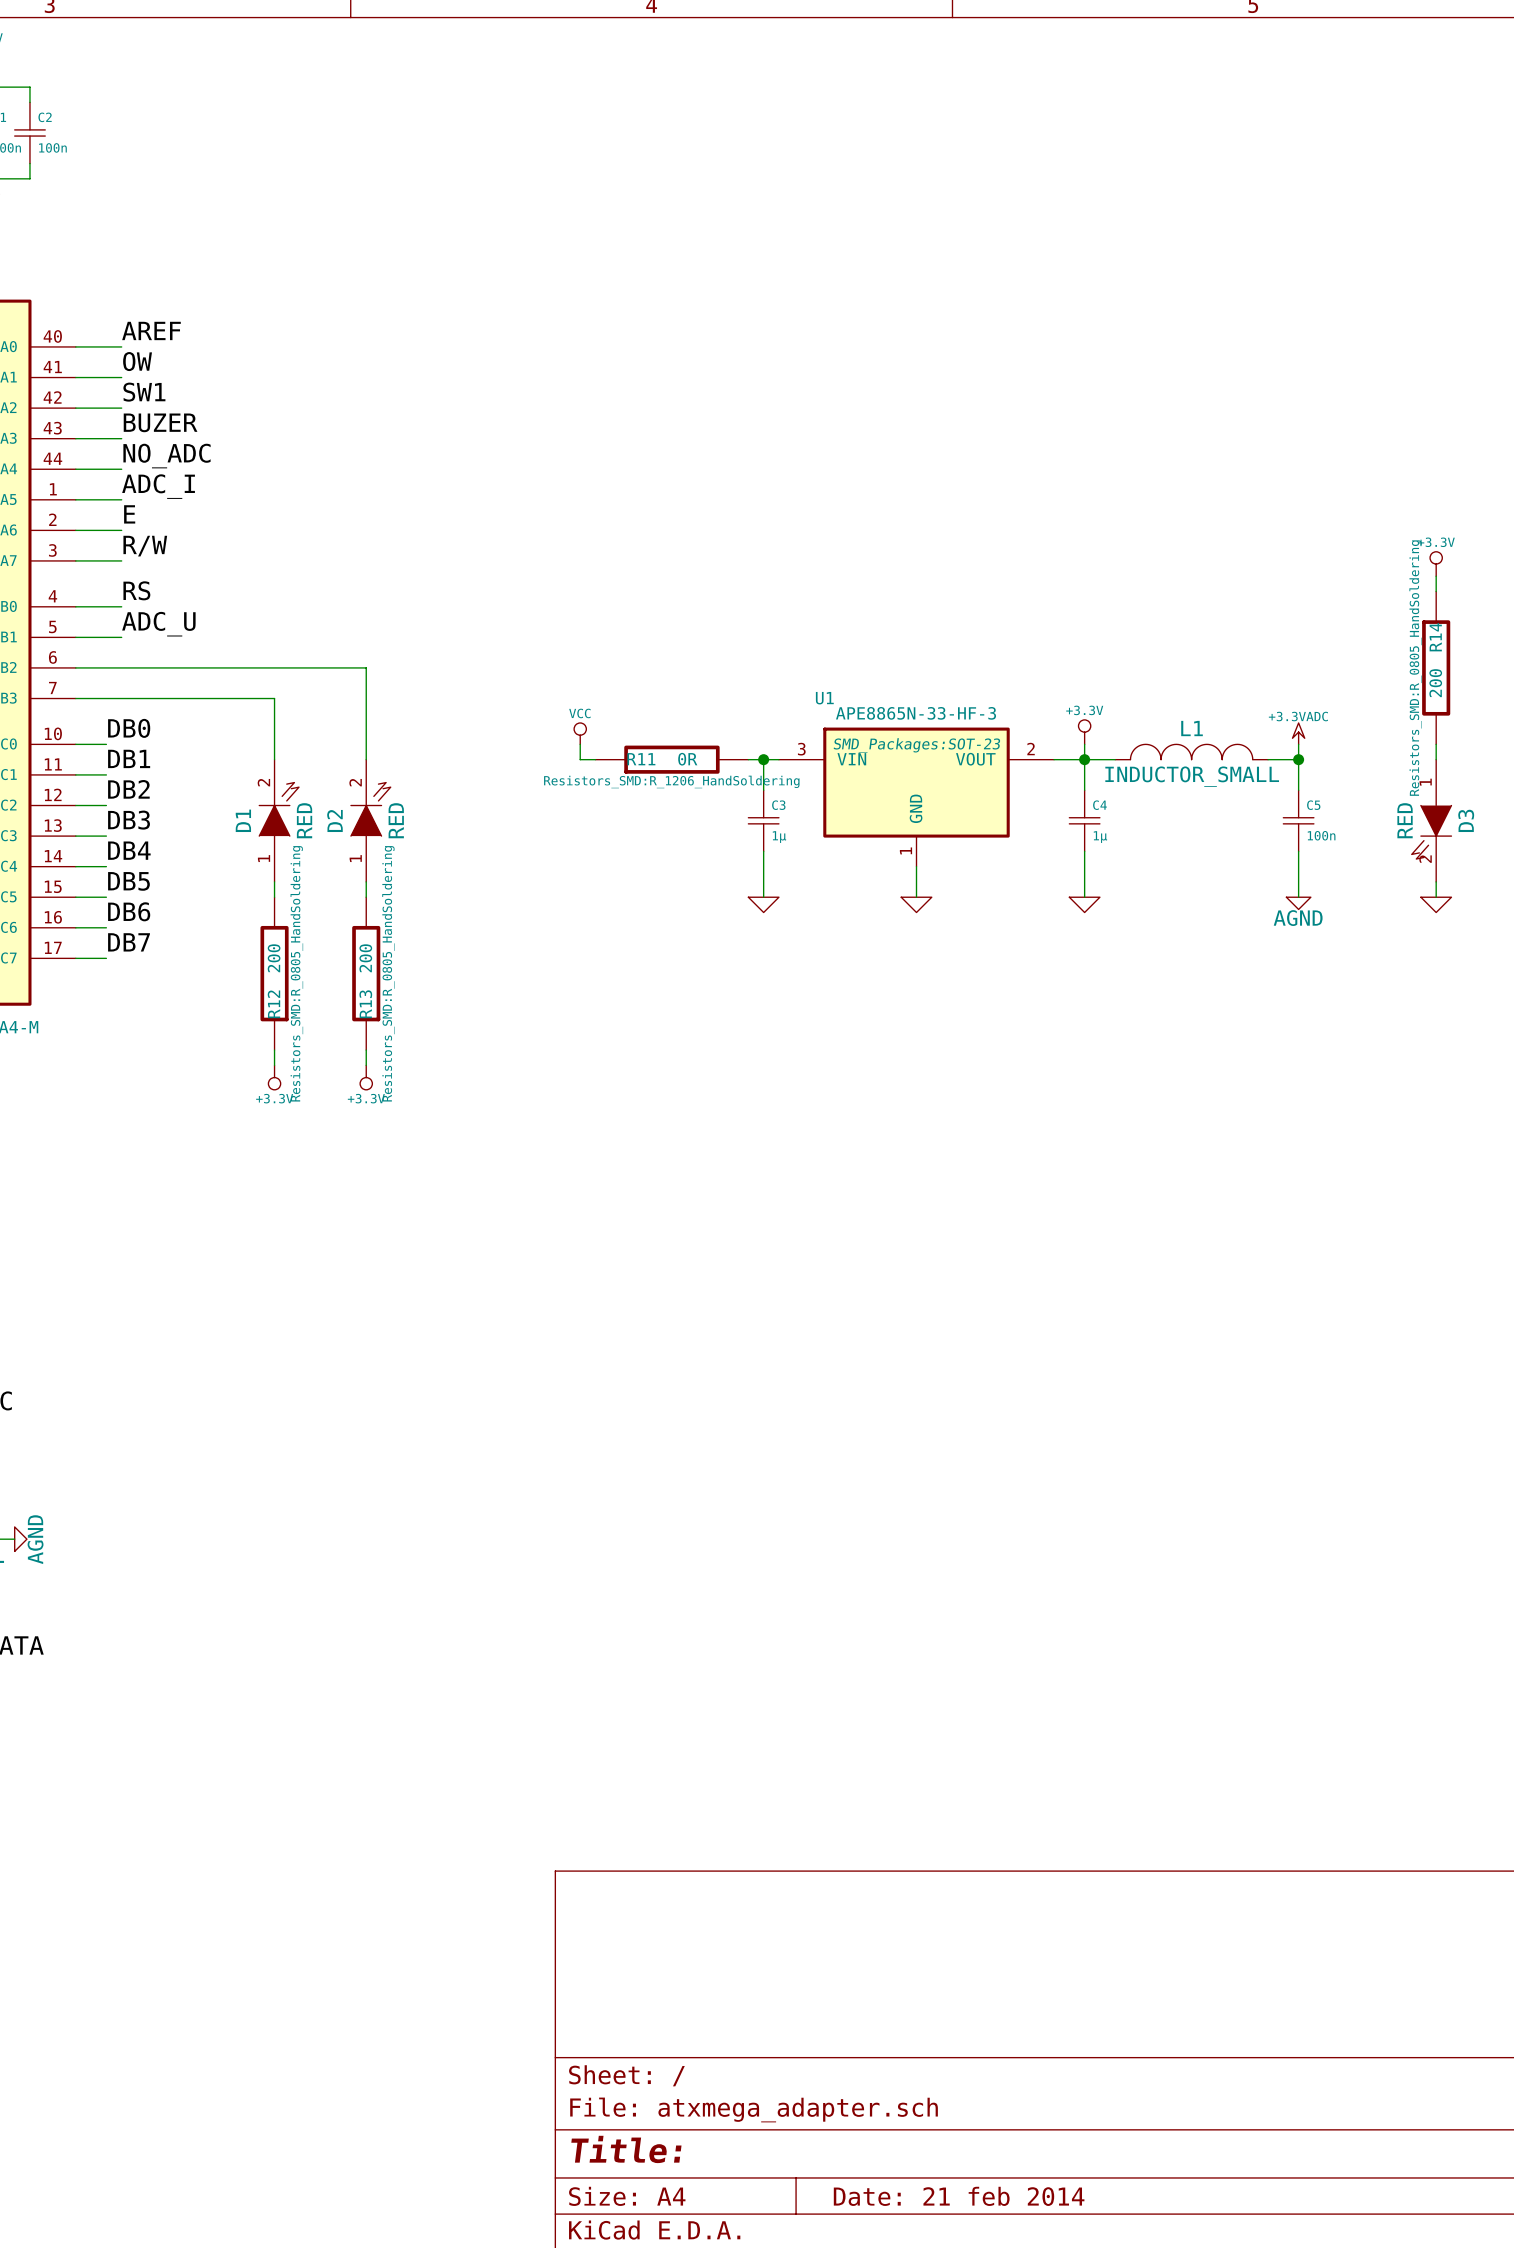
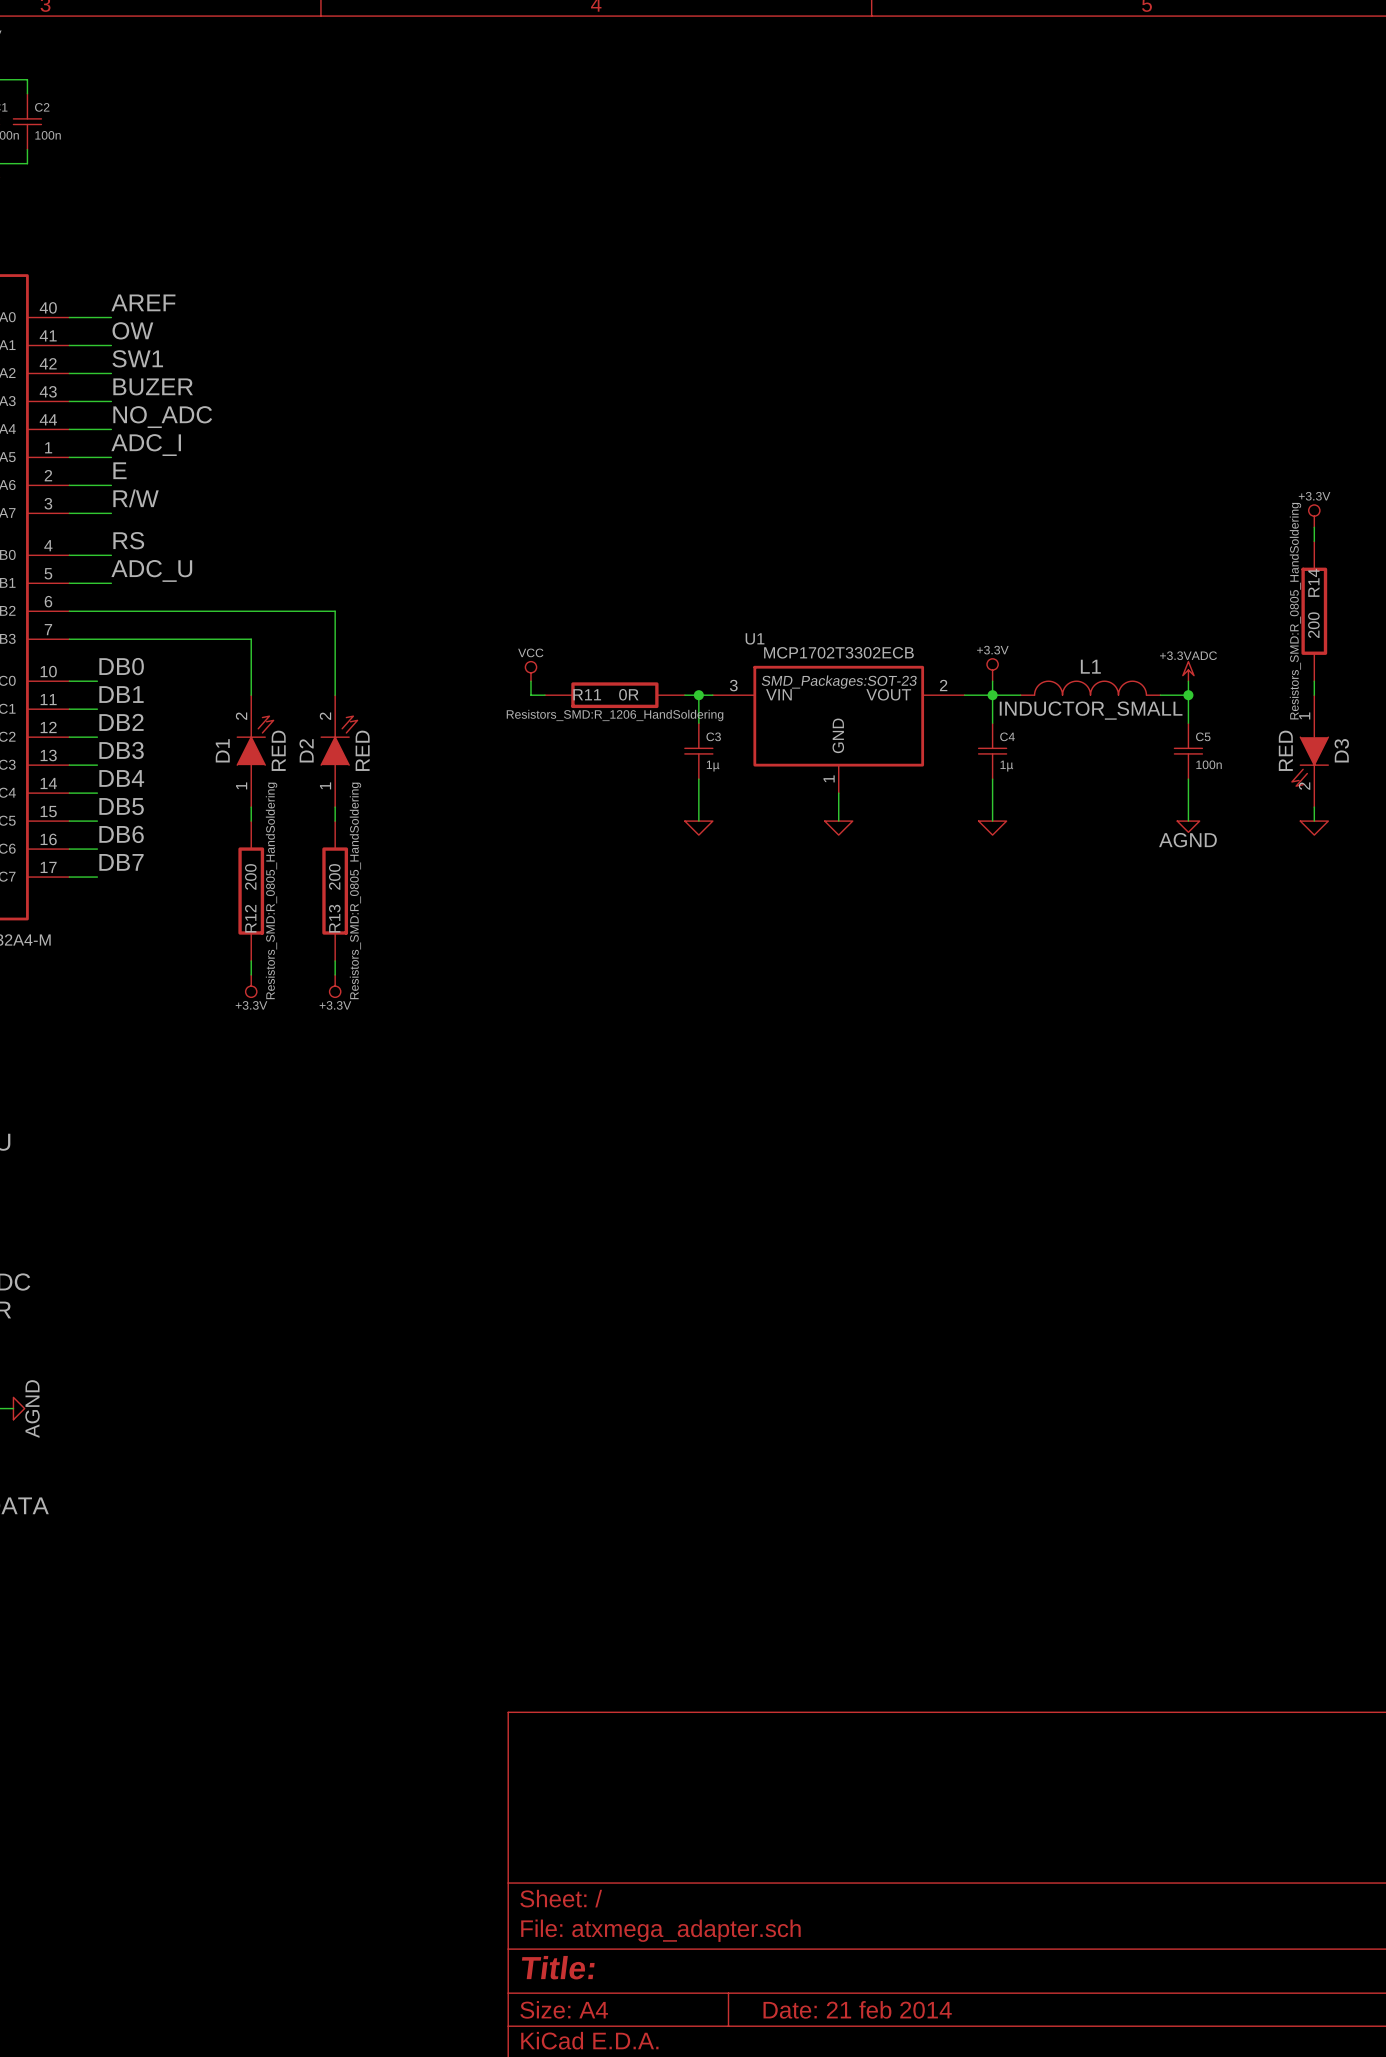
U1 value: APE8865N-33-HF-3 (916, 713) -> MCP1702T3302ECB (838, 652)

